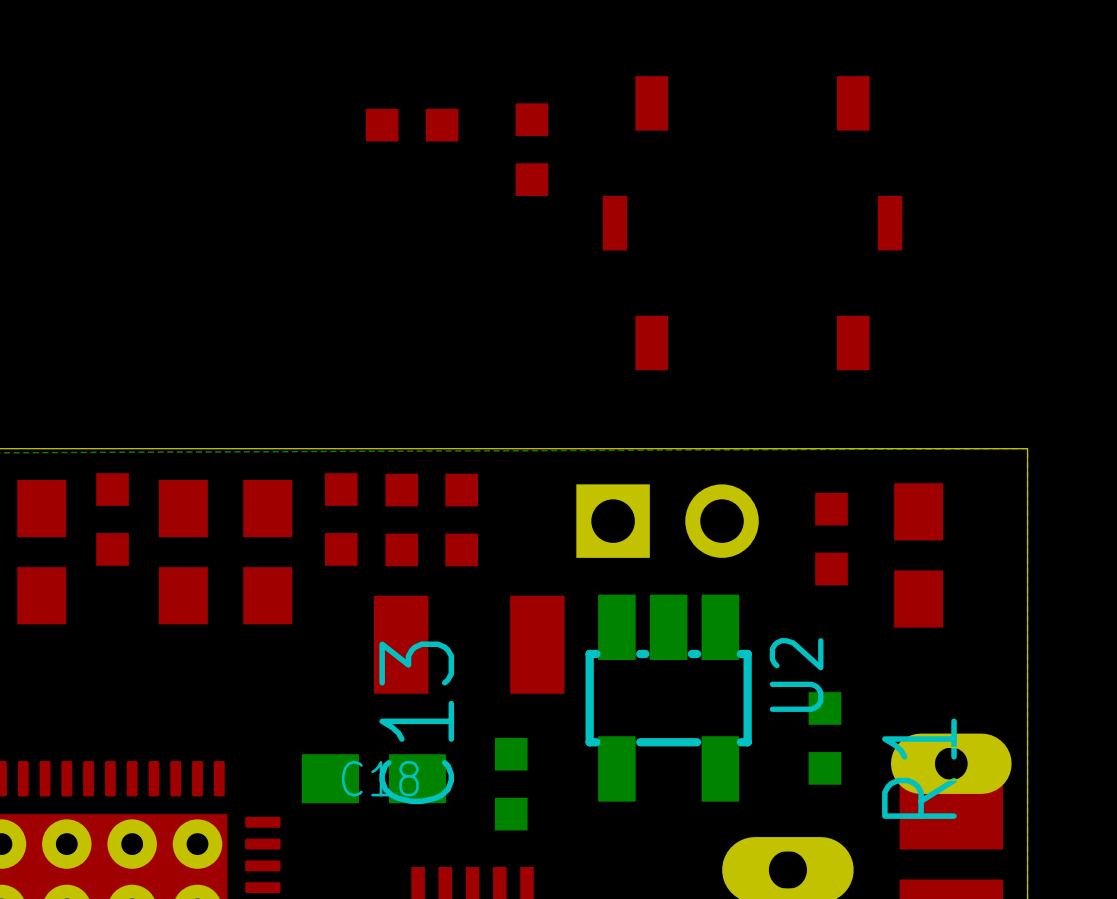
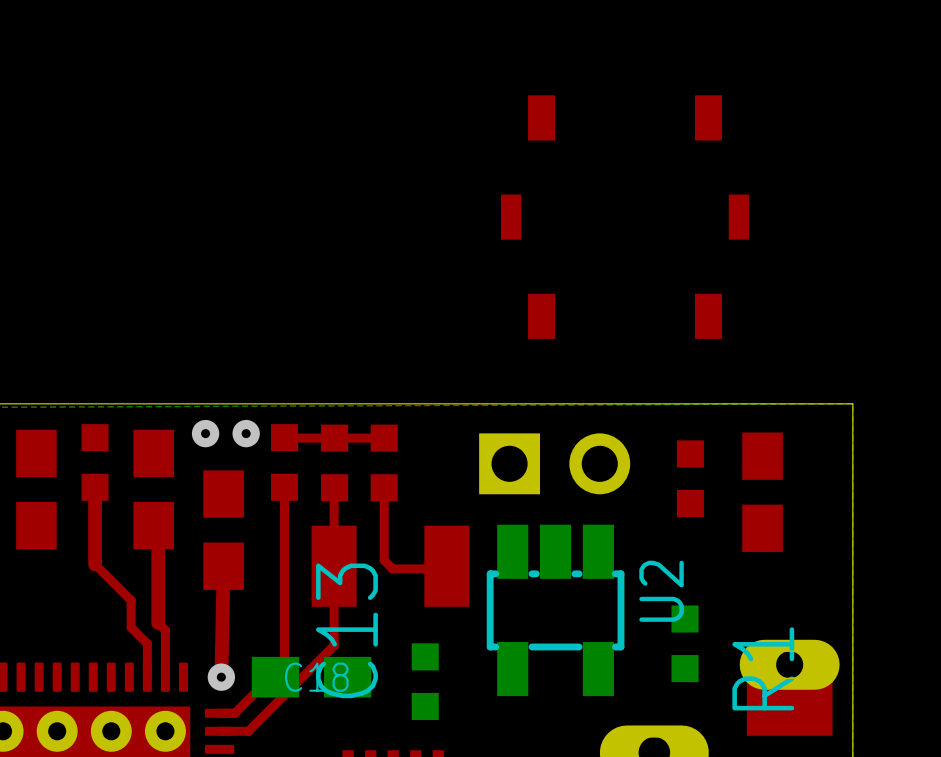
part: (412, 125) -> none
part: (531, 149) -> none
via: none -> (205, 433)
via: none -> (246, 433)
top track: none -> (384, 438) (284, 438)
top track: none -> (95, 487) (95, 564) (131, 600) (131, 627) (147, 643) (147, 677)
top track: none -> (284, 487) (284, 663) (234, 713) (219, 713)
top track: none -> (384, 487) (384, 560) (392, 568) (444, 568) (446, 566)
top track: none -> (334, 488) (334, 645) (248, 731) (219, 731)
part position: (267, 552) -> (223, 530)
top track: none -> (153, 525) (158, 530) (158, 623) (165, 630) (165, 677)
top track: none -> (223, 566) (221, 677)
via: none -> (221, 677)

